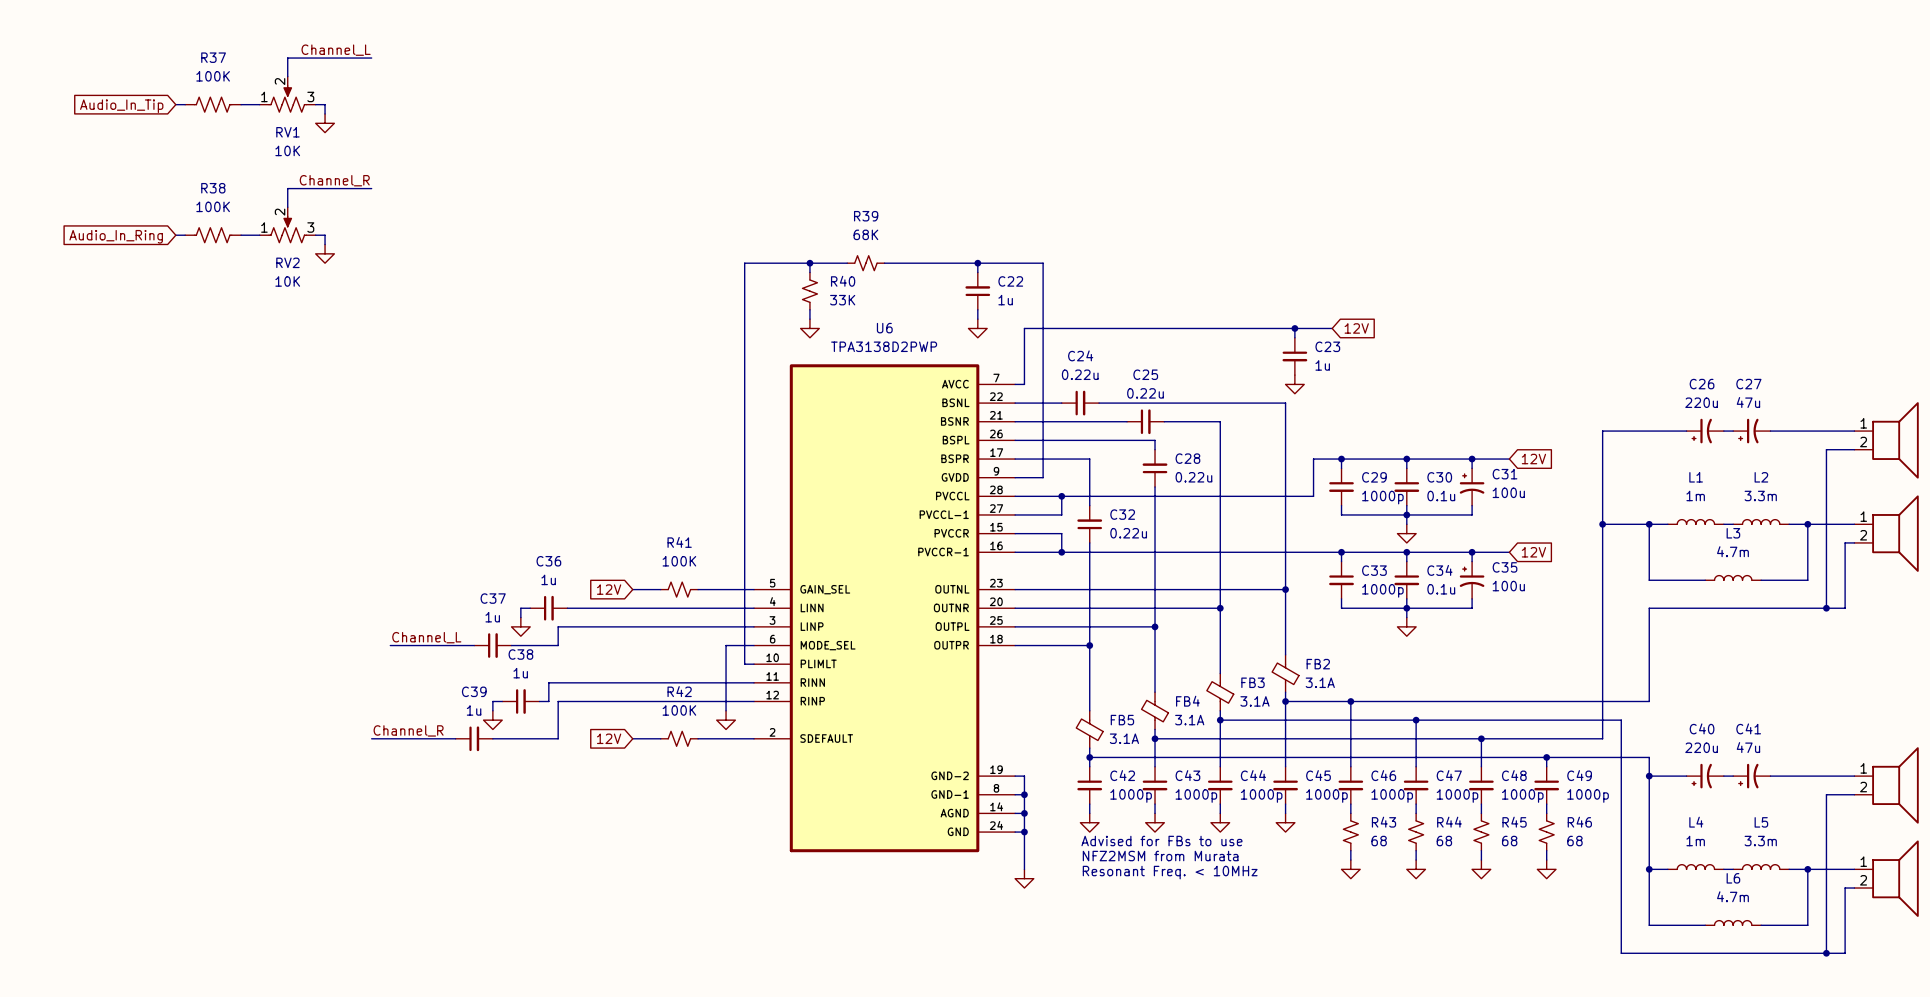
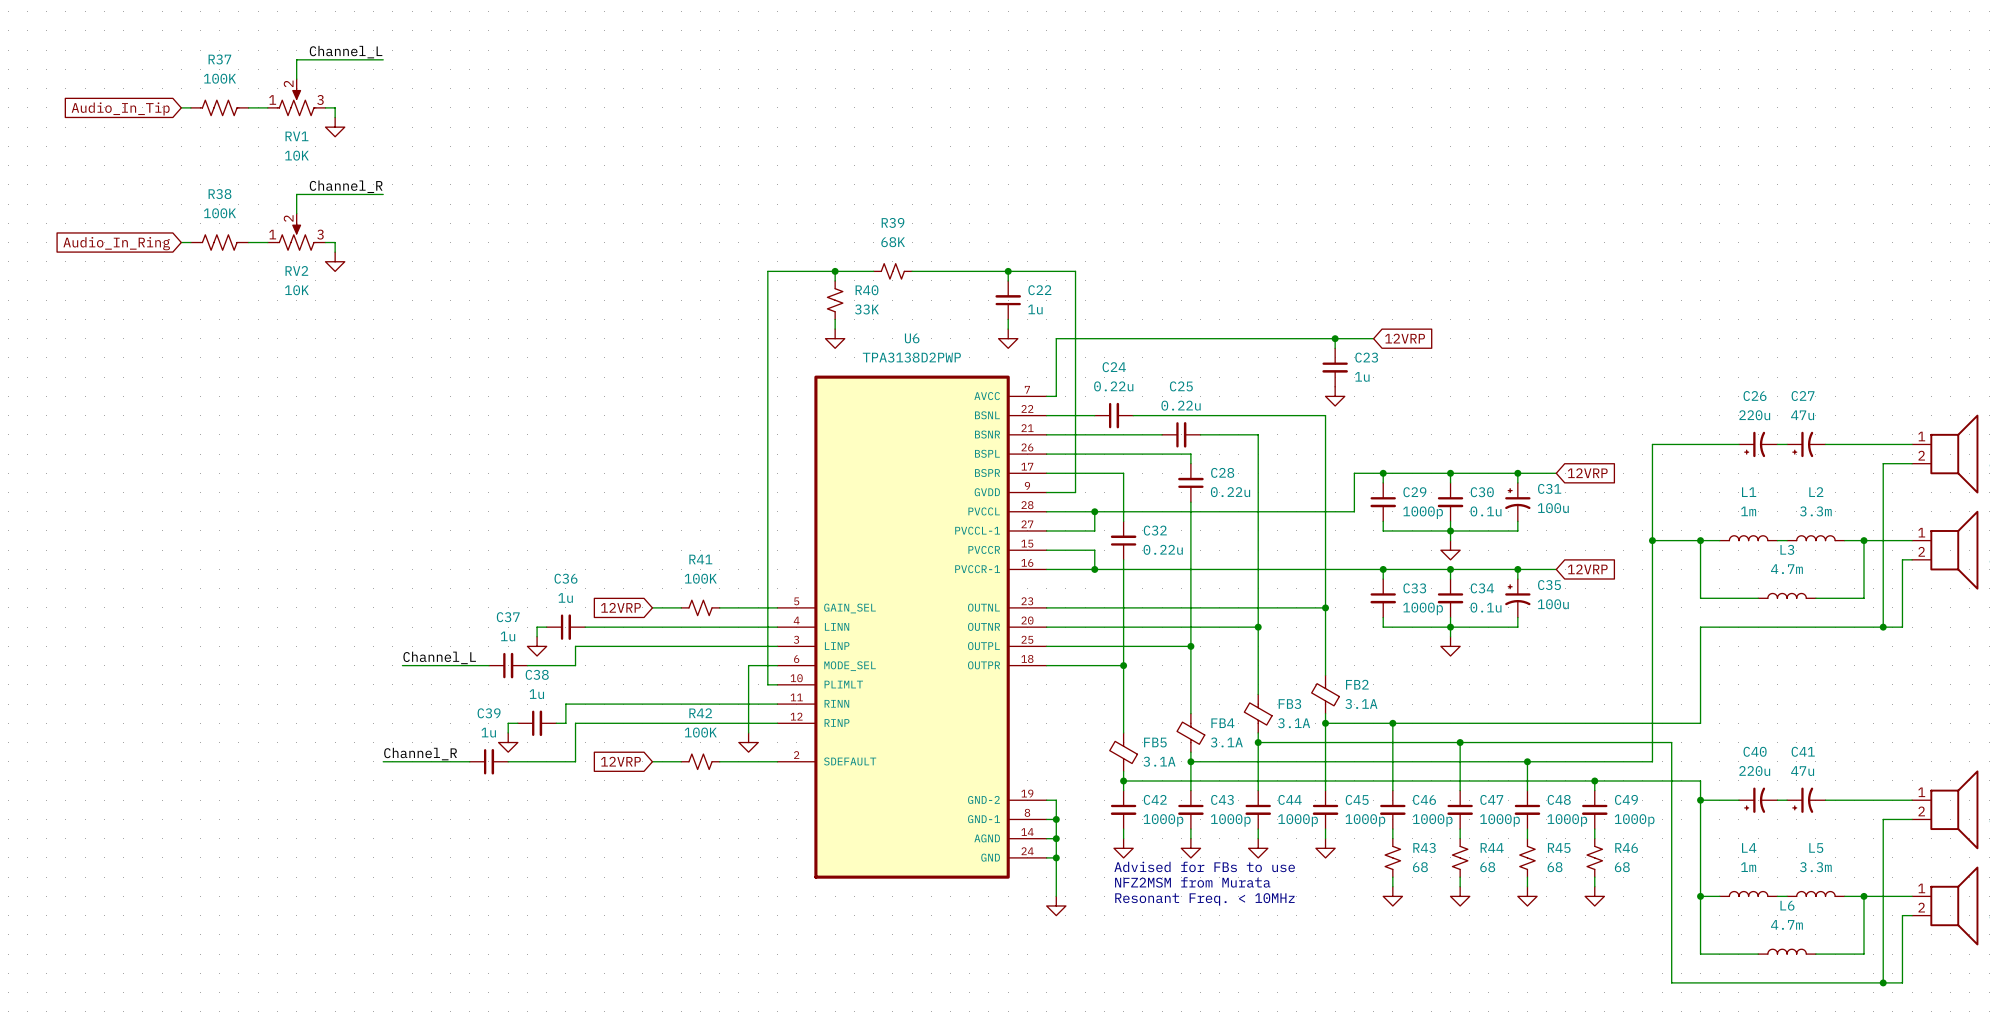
global label: 12V (1356, 328) -> 12VRP (1405, 338)
global label: 12V (1533, 459) -> 12VRP (1587, 473)
global label: 12V (1533, 552) -> 12VRP (1587, 569)
global label: 12V (609, 589) -> 12VRP (620, 607)
global label: 12V (609, 738) -> 12VRP (620, 761)

